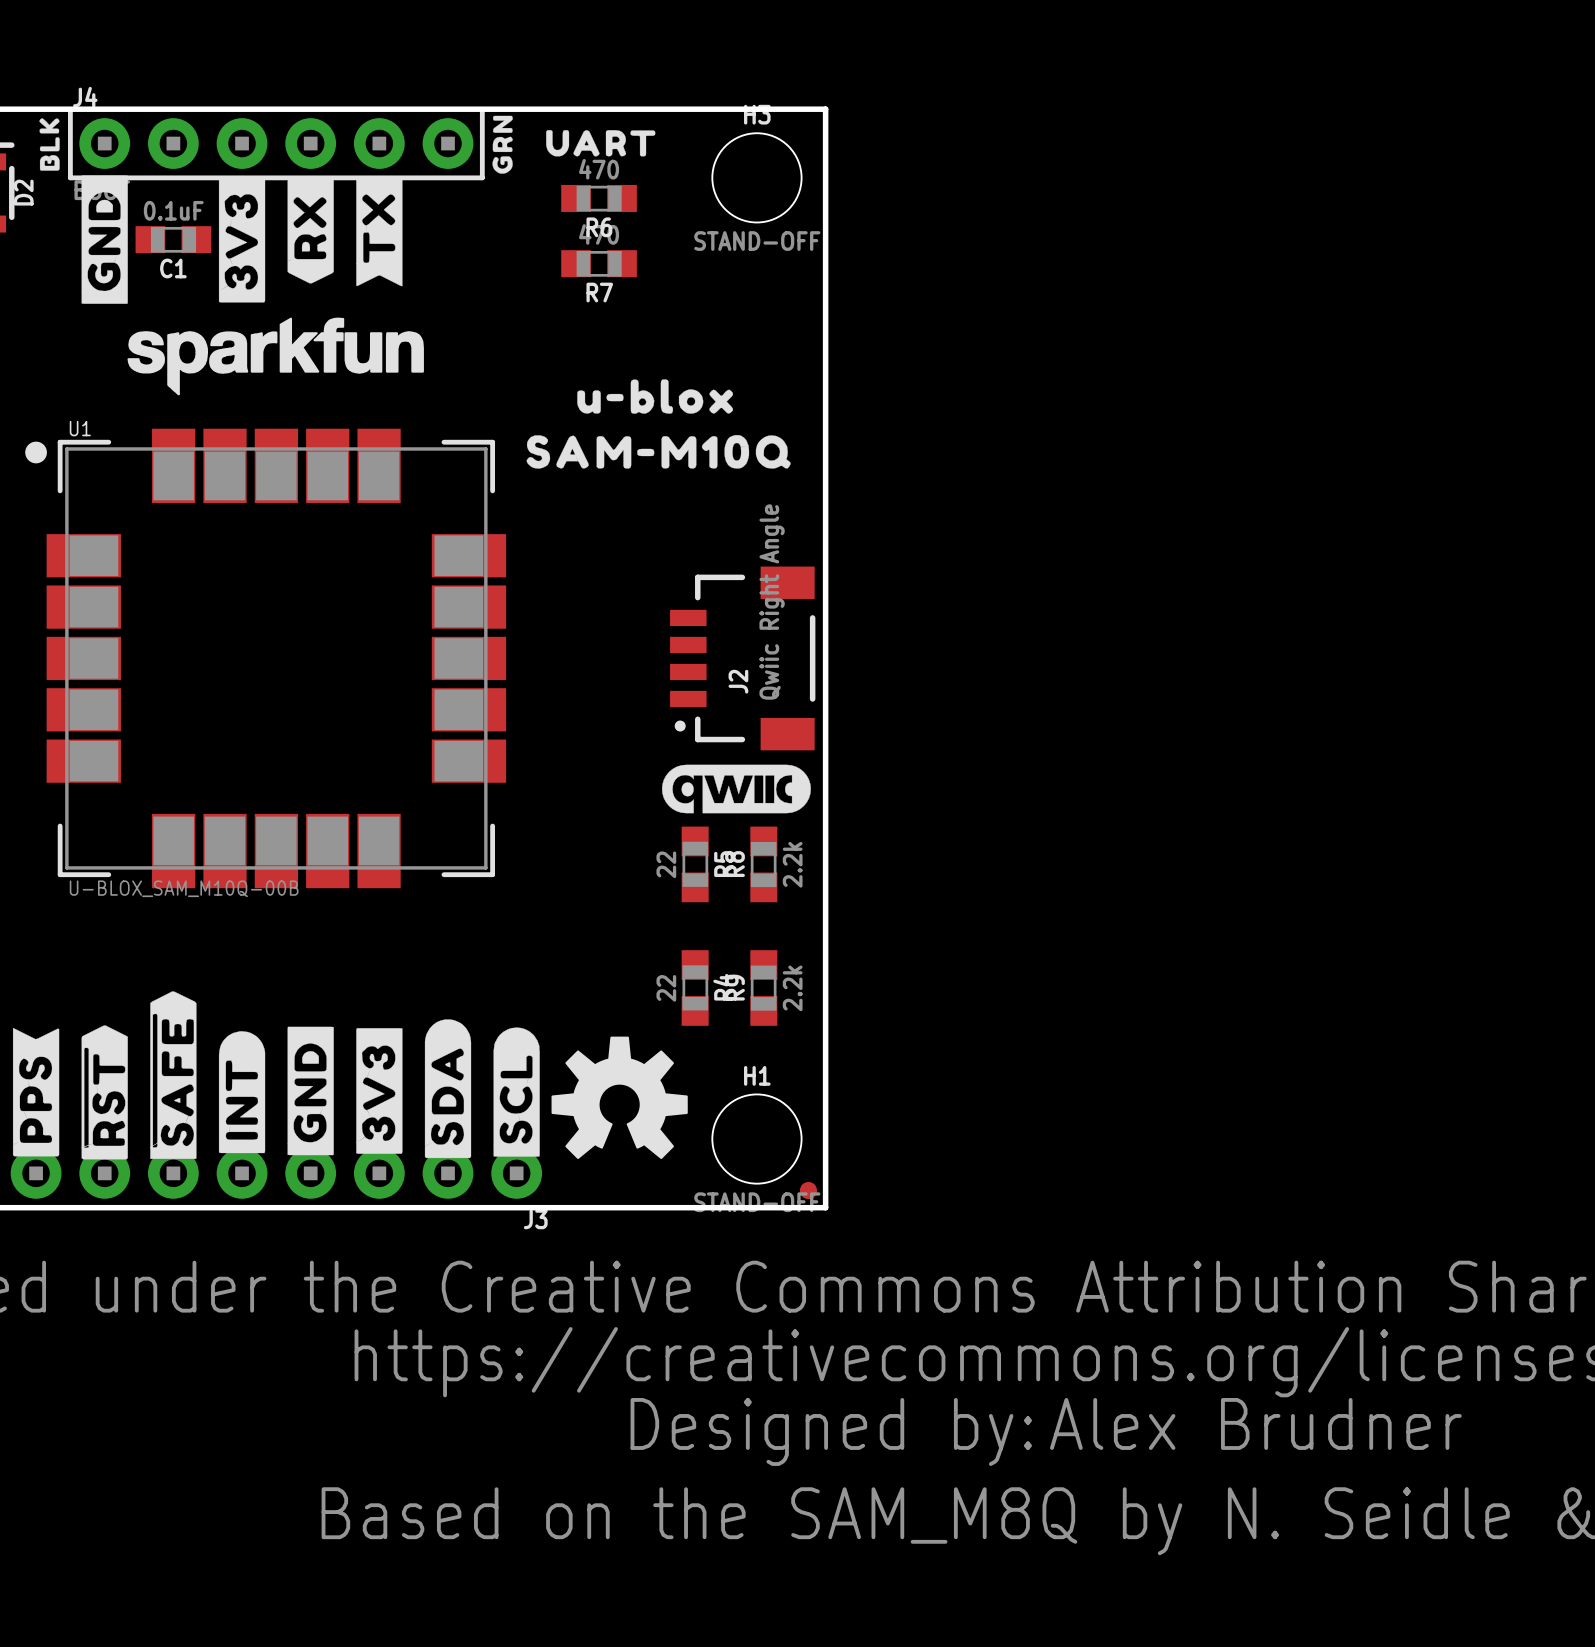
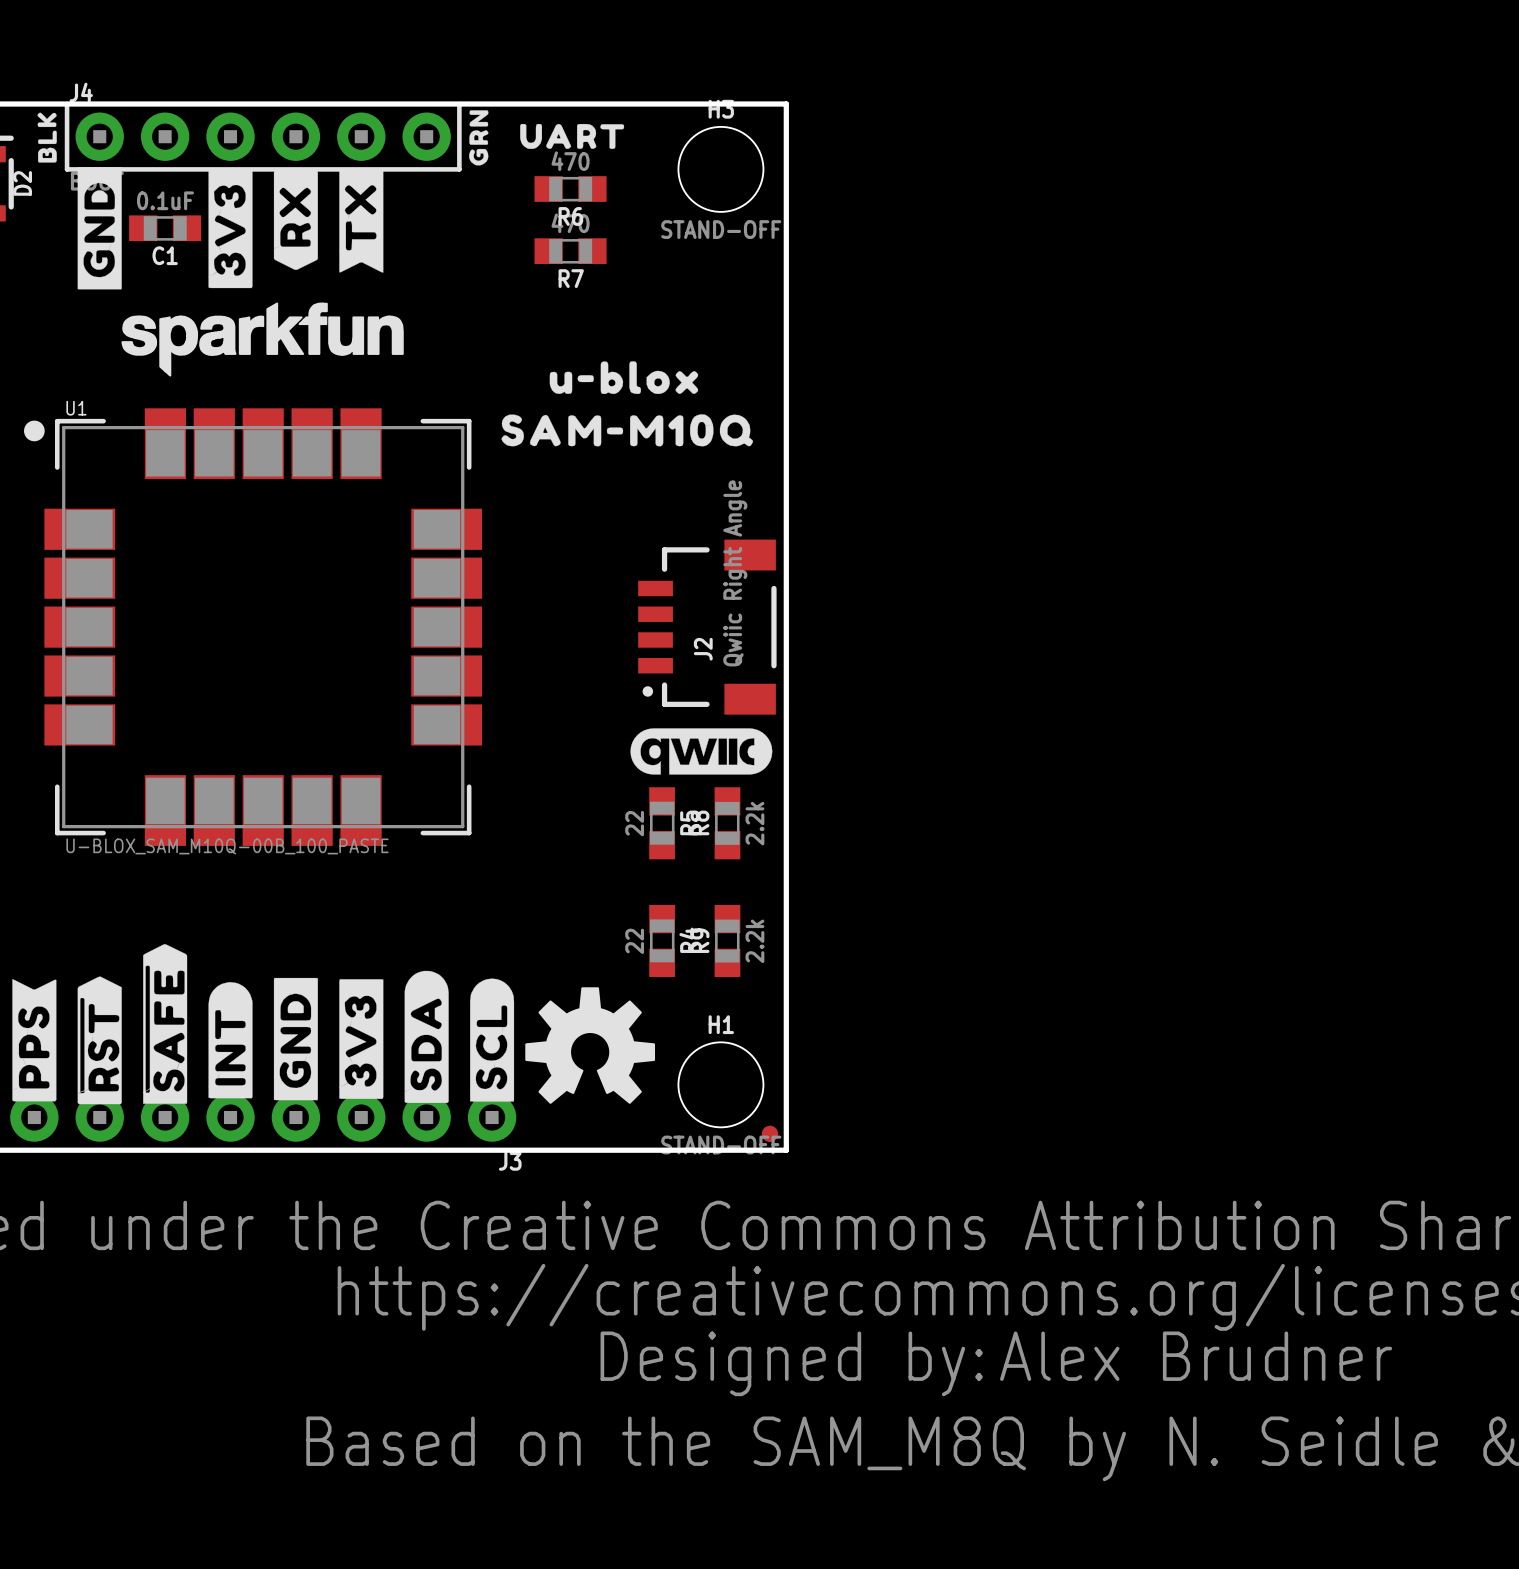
U1 value: U-BLOX_SAM_M10Q-00B (184, 888) -> U-BLOX_SAM_M10Q-00B_100_PASTE (227, 846)

